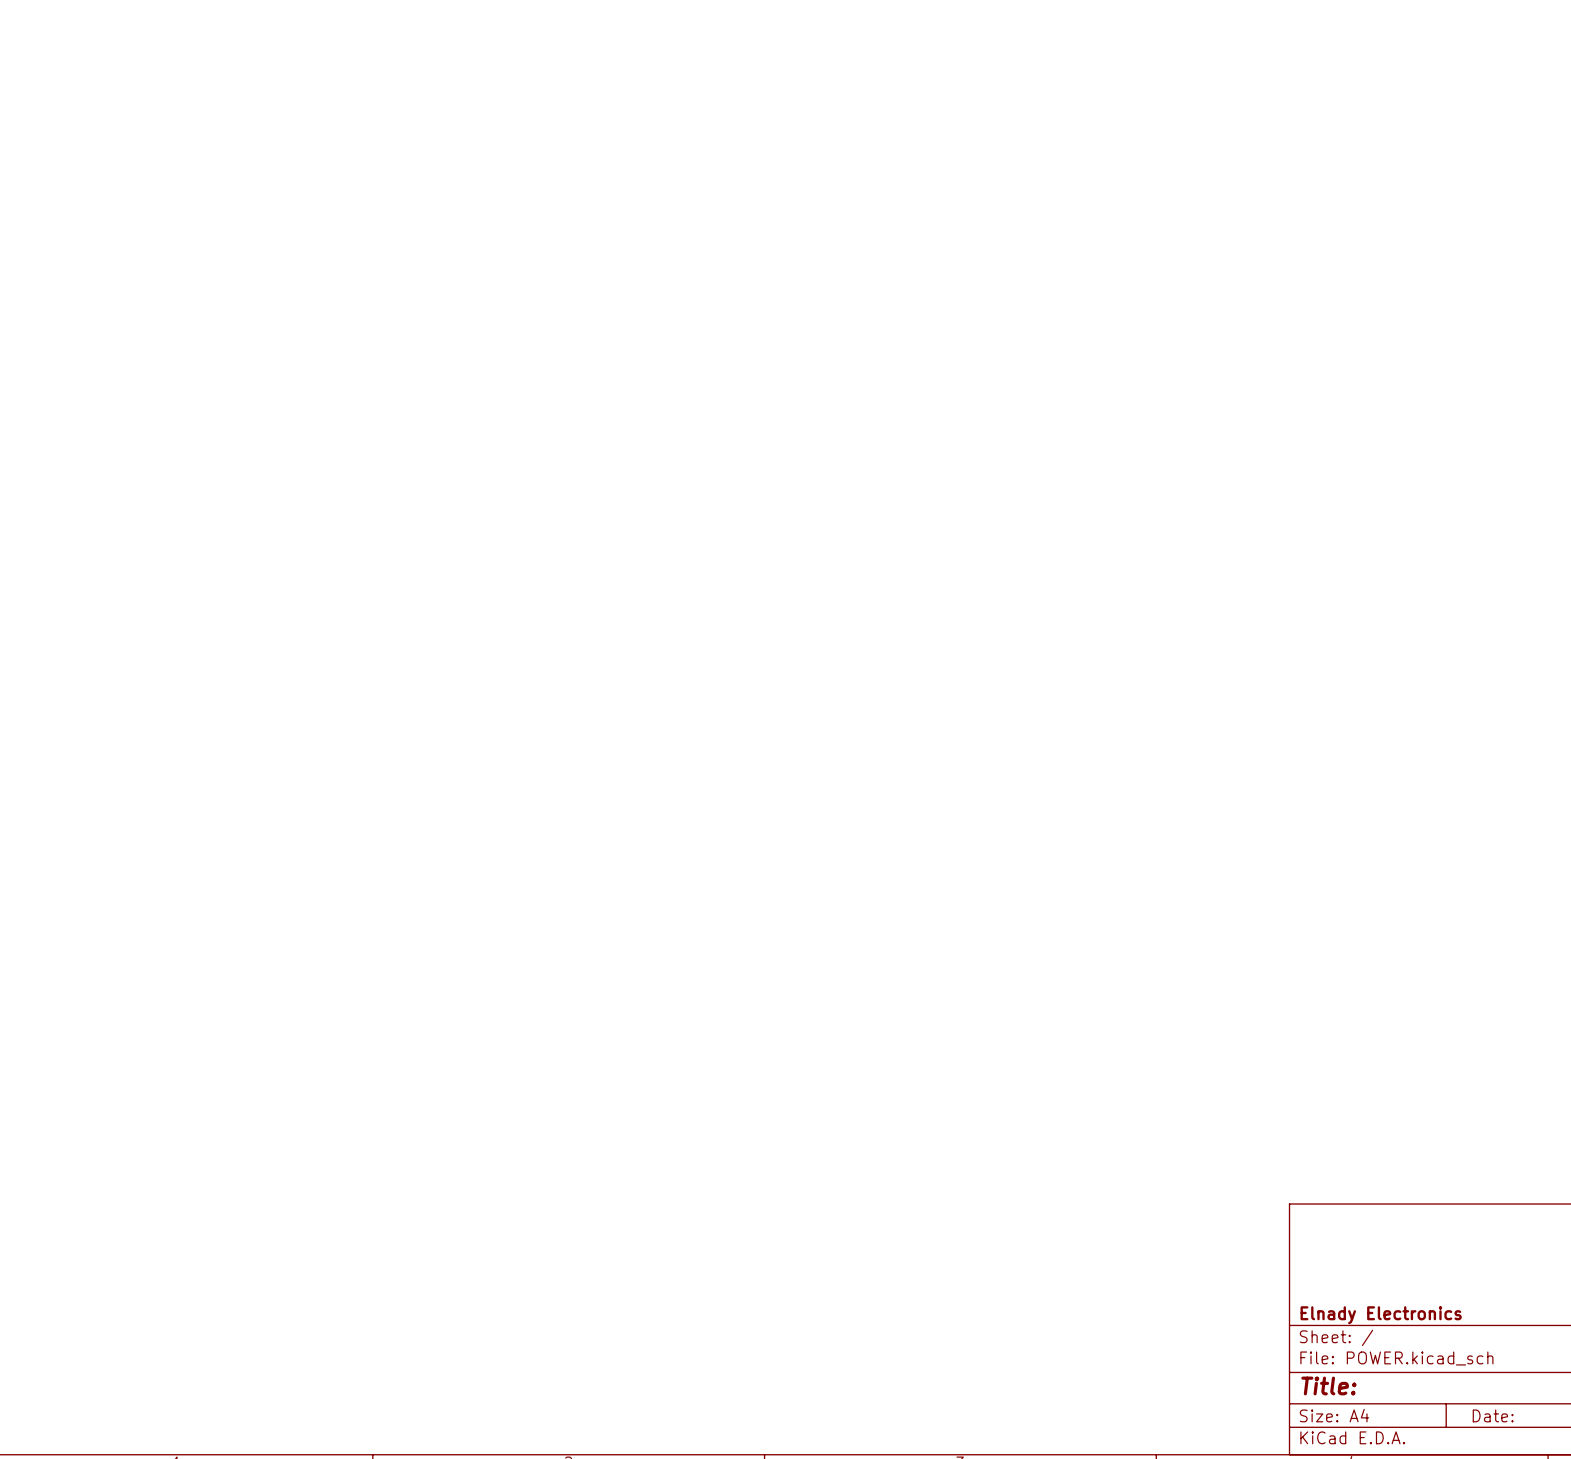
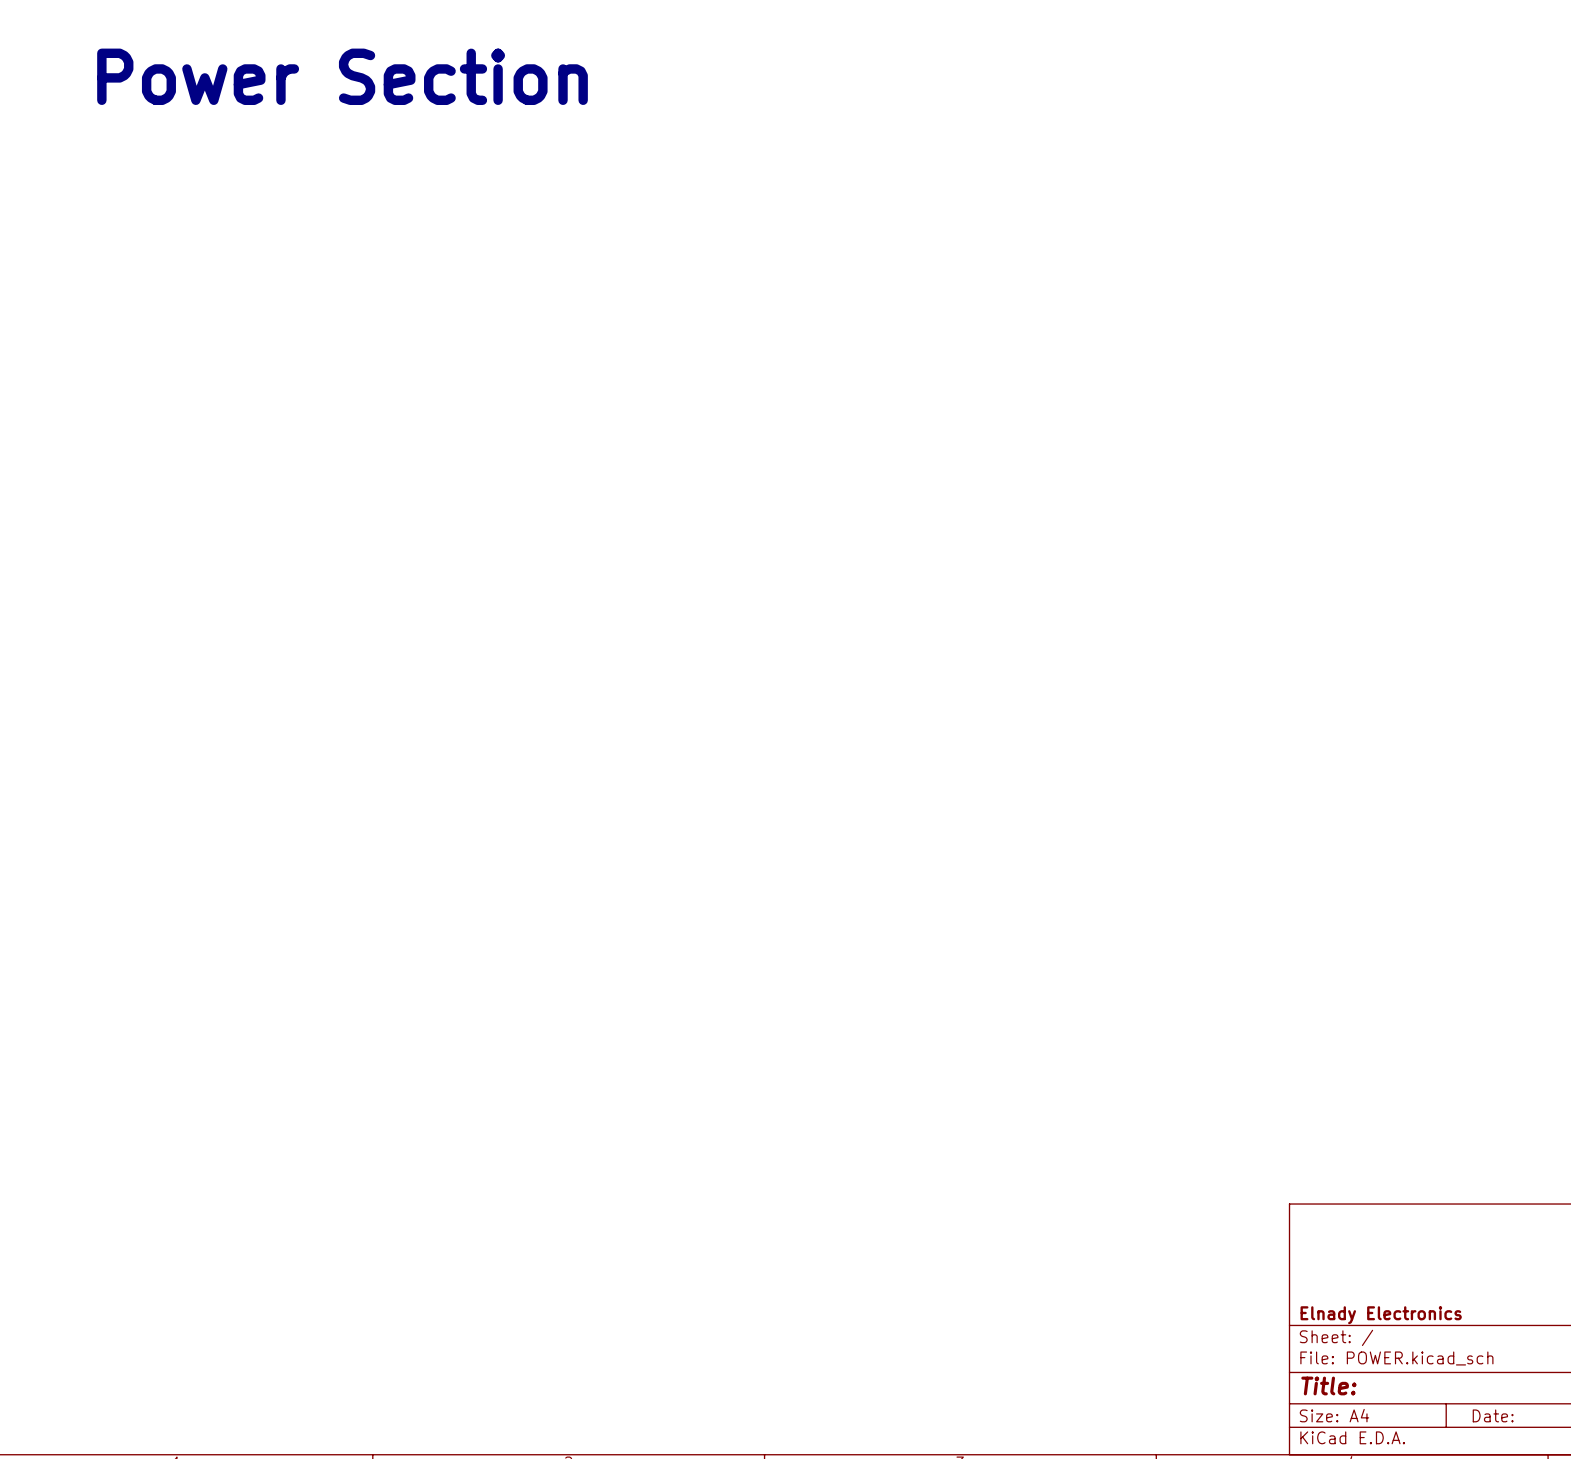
text: none -> Power Section (342, 76)

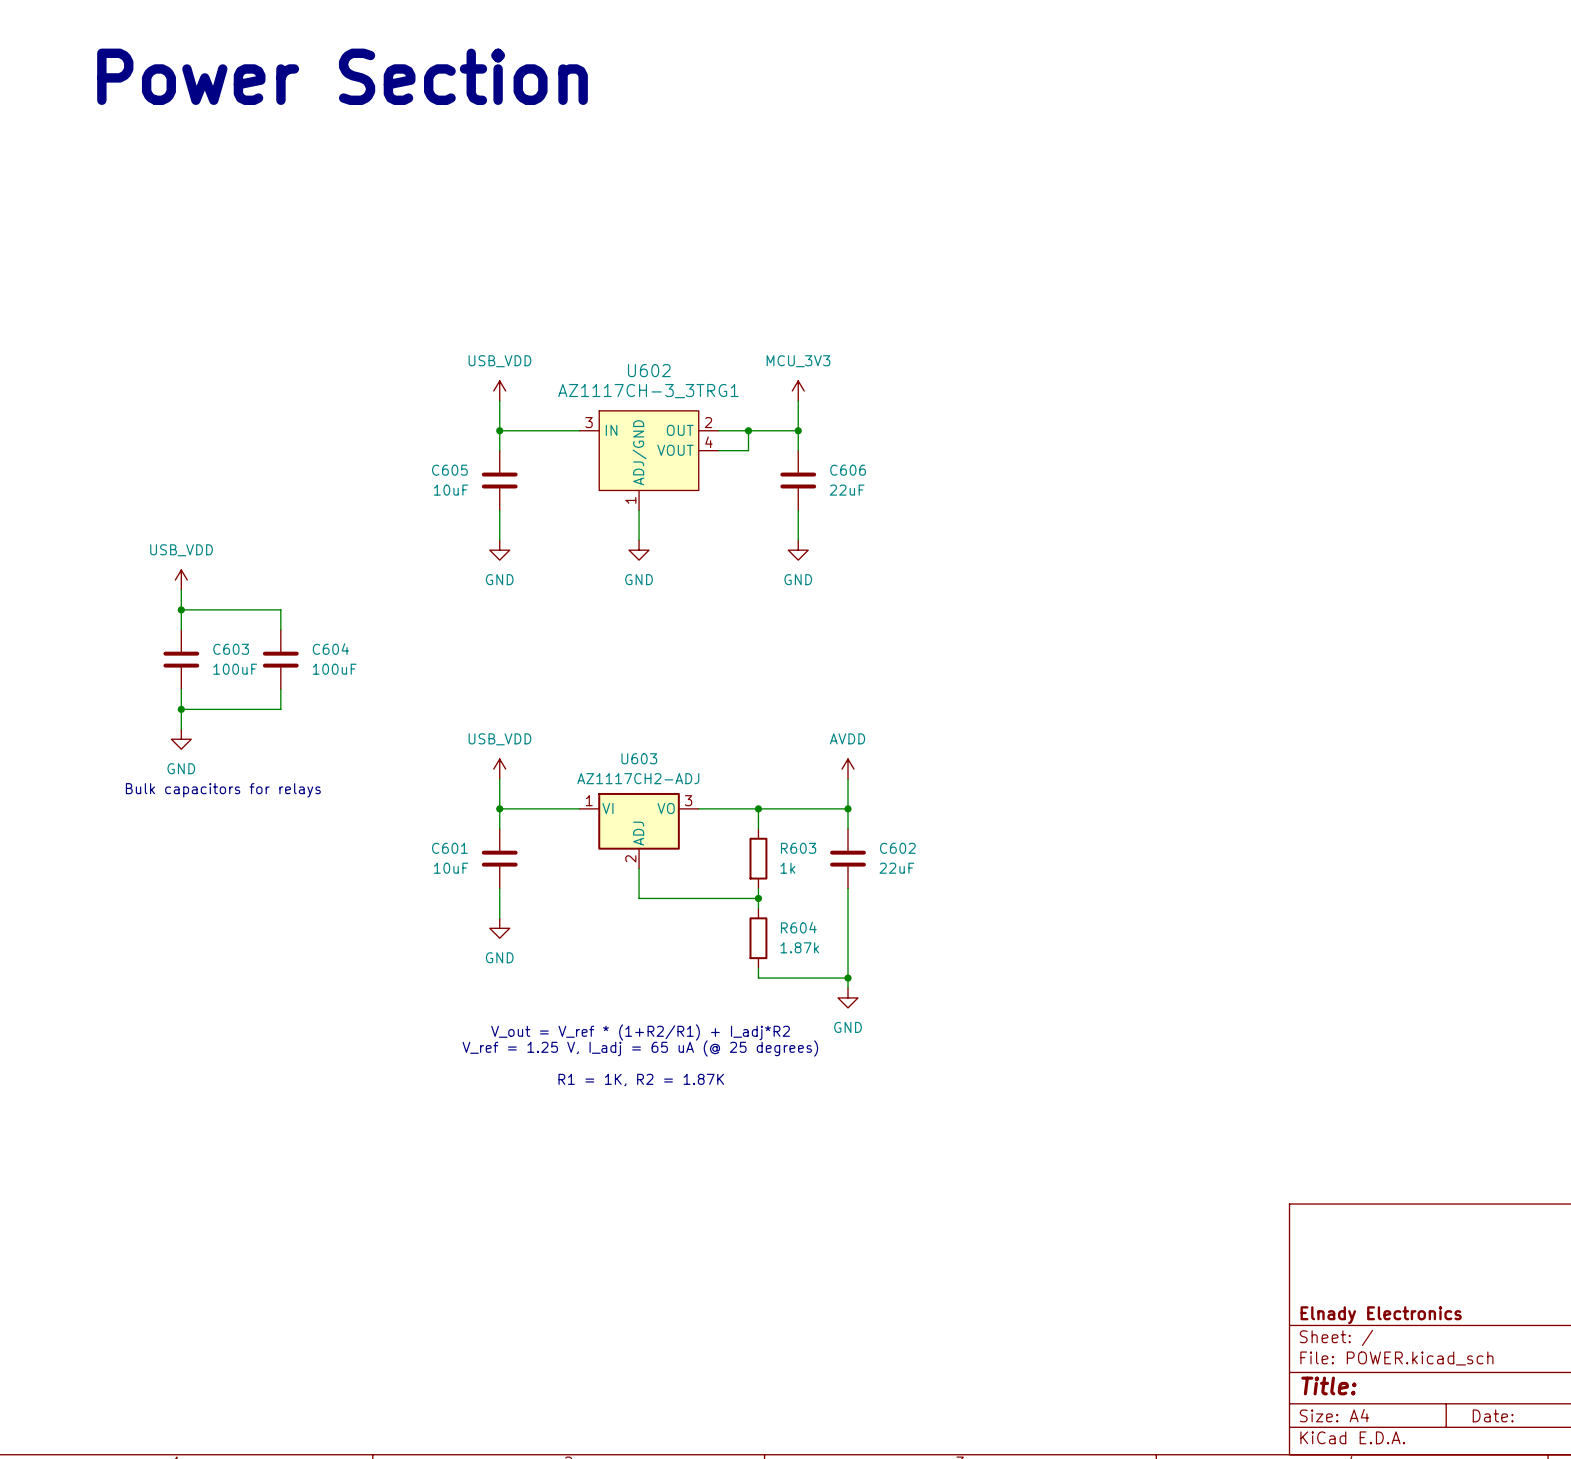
power symbol: none -> USB_VDD (499, 390)
power symbol: none -> MCU_3V3 (798, 390)
wire: none -> (499, 400) (499, 450)
wire: none -> (798, 400) (798, 450)
wire: none -> (499, 430) (579, 430)
junction: none -> (499, 430)
wire: none -> (718, 430) (798, 430)
wire: none -> (748, 430) (748, 450) (718, 450)
junction: none -> (748, 430)
junction: none -> (798, 430)
U602: none -> AZ1117CH-3_3TRG1 (648, 460)
C605: none -> 10uF (499, 480)
C606: none -> 22uF (798, 480)
wire: none -> (499, 510) (499, 540)
wire: none -> (639, 510) (639, 540)
wire: none -> (798, 510) (798, 540)
power symbol: none -> GND (499, 550)
power symbol: none -> GND (639, 550)
power symbol: none -> GND (798, 550)
power symbol: none -> USB_VDD (181, 580)
wire: none -> (181, 589) (181, 629)
wire: none -> (181, 609) (280, 609) (280, 629)
junction: none -> (181, 609)
C603: none -> 100uF (181, 659)
C604: none -> 100uF (280, 659)
wire: none -> (181, 689) (181, 729)
wire: none -> (280, 689) (280, 709) (181, 709)
junction: none -> (181, 709)
power symbol: none -> GND (181, 739)
power symbol: none -> USB_VDD (499, 769)
power symbol: none -> AVDD (848, 769)
wire: none -> (499, 779) (499, 828)
wire: none -> (848, 779) (848, 828)
text: none -> Bulk capacitors for relays (223, 790)
wire: none -> (499, 808) (579, 808)
junction: none -> (499, 808)
wire: none -> (698, 808) (848, 808)
wire: none -> (758, 808) (758, 828)
junction: none -> (758, 808)
junction: none -> (848, 808)
U603: none -> AZ1117CH2-ADJ (639, 830)
C601: none -> 10uF (499, 858)
R603: none -> 1k (758, 858)
C602: none -> 22uF (848, 858)
wire: none -> (639, 868) (639, 898) (758, 898)
wire: none -> (499, 888) (499, 918)
wire: none -> (758, 888) (758, 908)
wire: none -> (848, 888) (848, 988)
junction: none -> (758, 898)
power symbol: none -> GND (499, 928)
R604: none -> 1.87k (758, 938)
wire: none -> (758, 968) (758, 978) (848, 978)
junction: none -> (848, 978)
power symbol: none -> GND (848, 997)
text: none -> V_out = V_ref * (1+R2/R1) + I_adj*R2 (640, 1032)
text: none -> V_ref = 1.25 V, I_adj = 65 uA (@ 25 degrees) (640, 1048)
text: none -> R1 = 1K, R2 = 1.87K (641, 1080)

